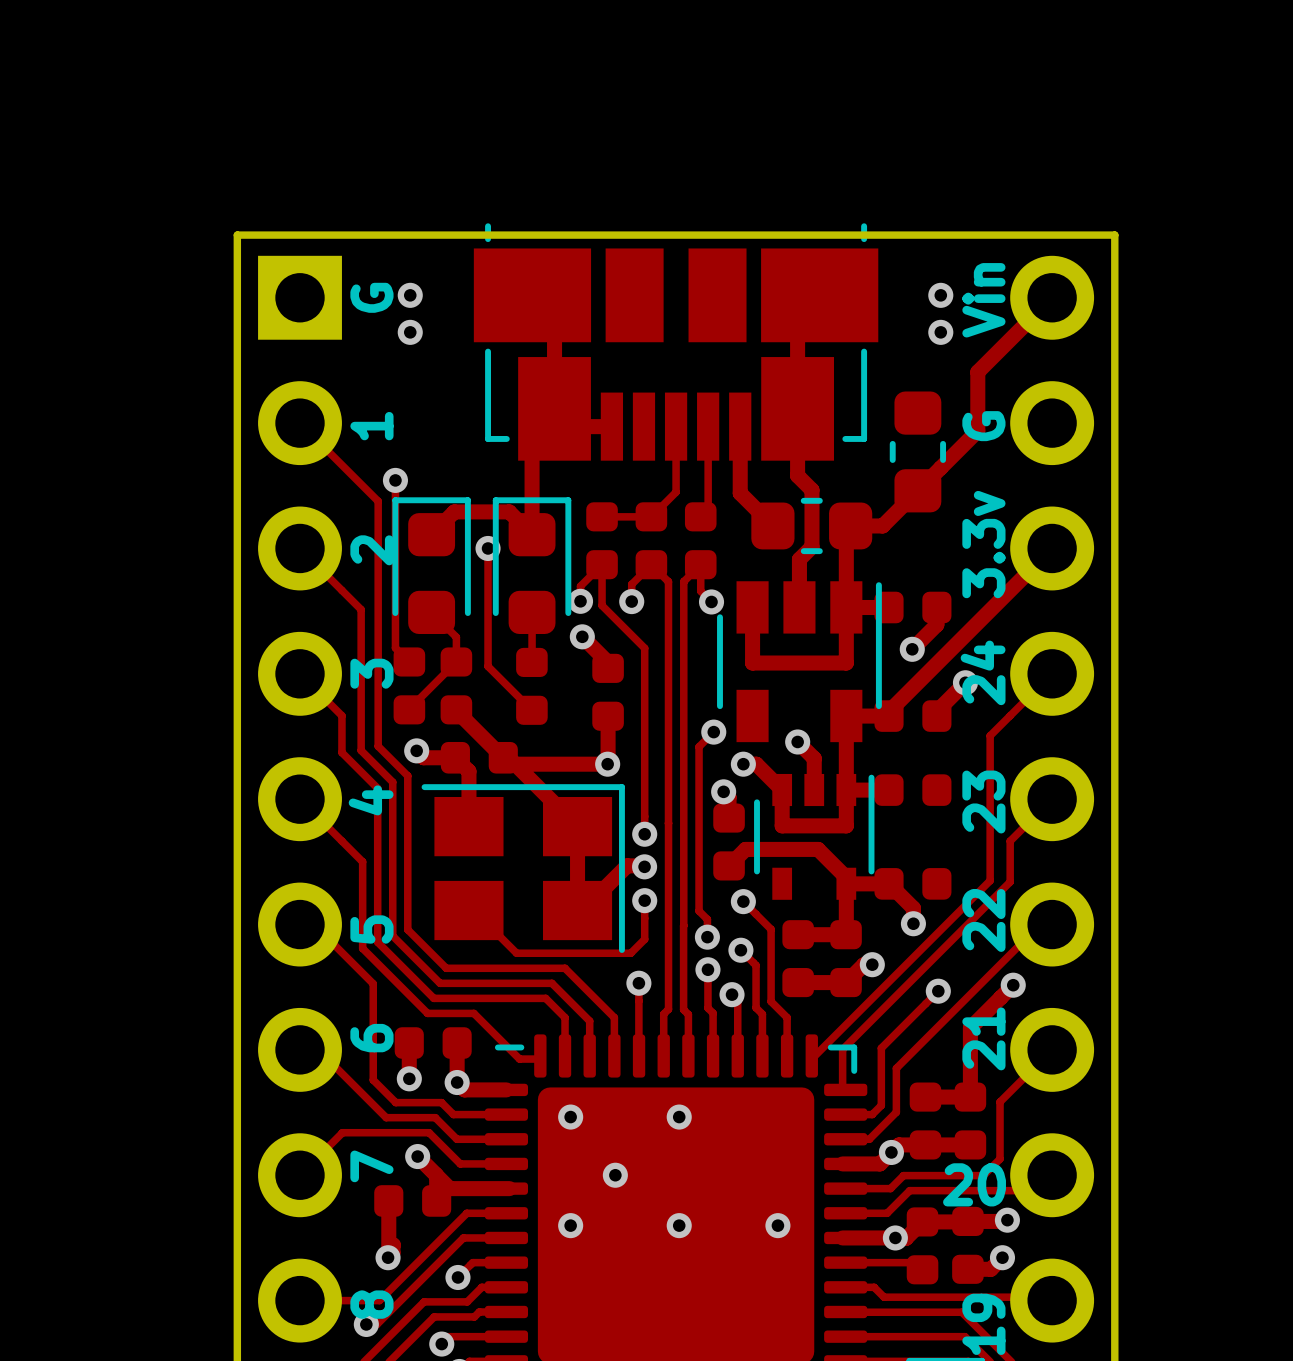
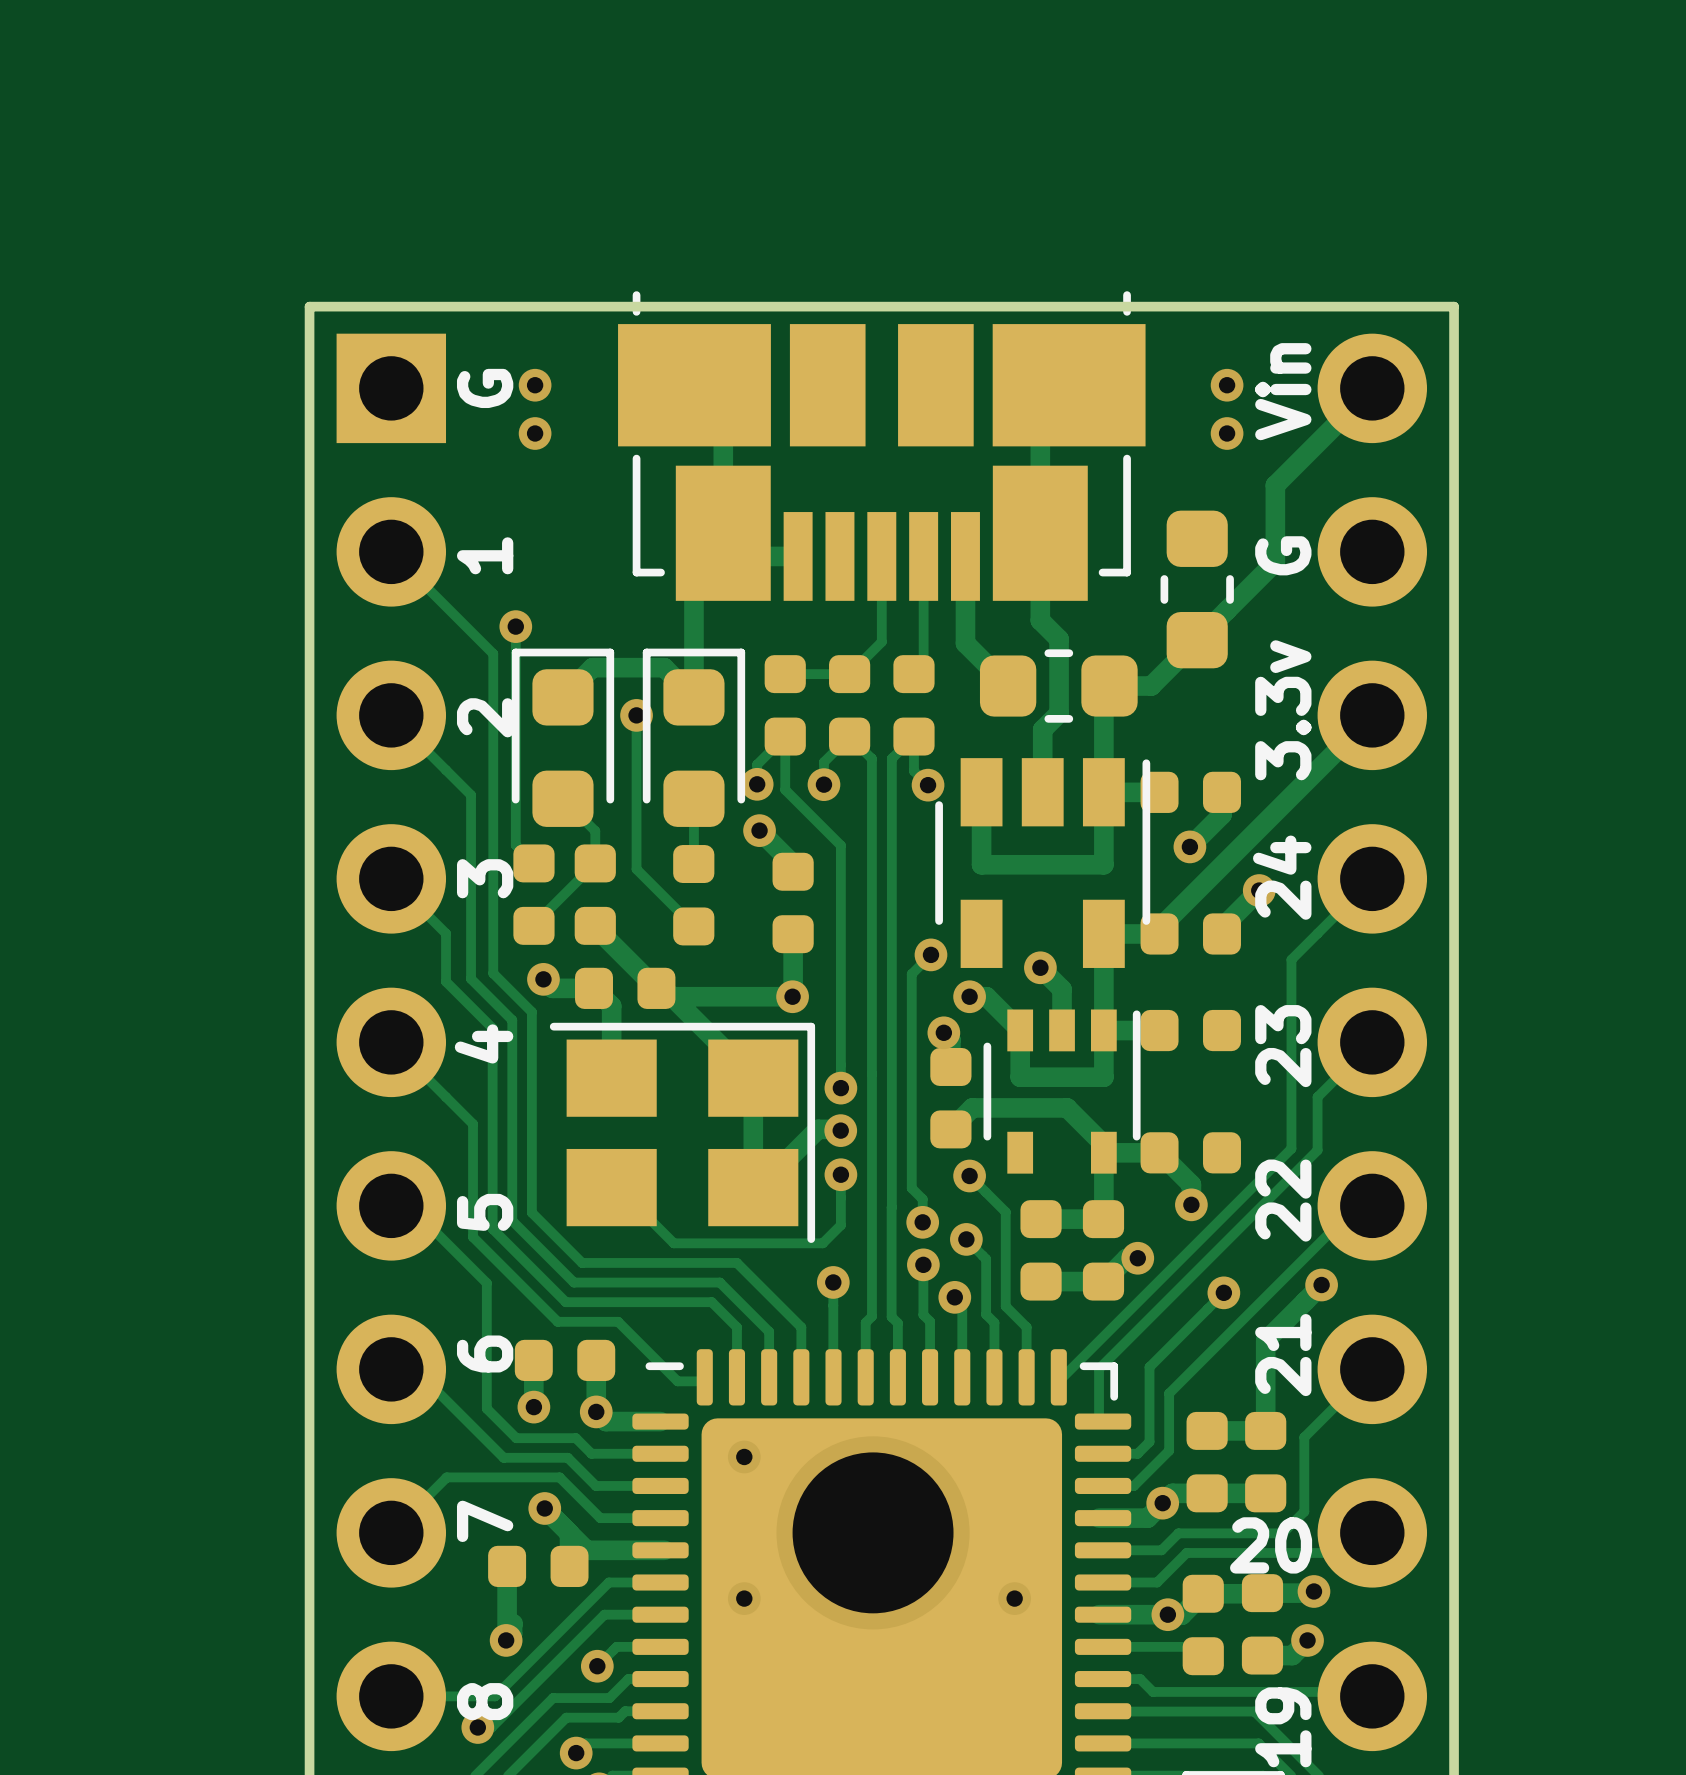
via: (679, 1117) -> none
via: (615, 1175) -> none
via: none -> (873, 1532)
via: (679, 1225) -> none

